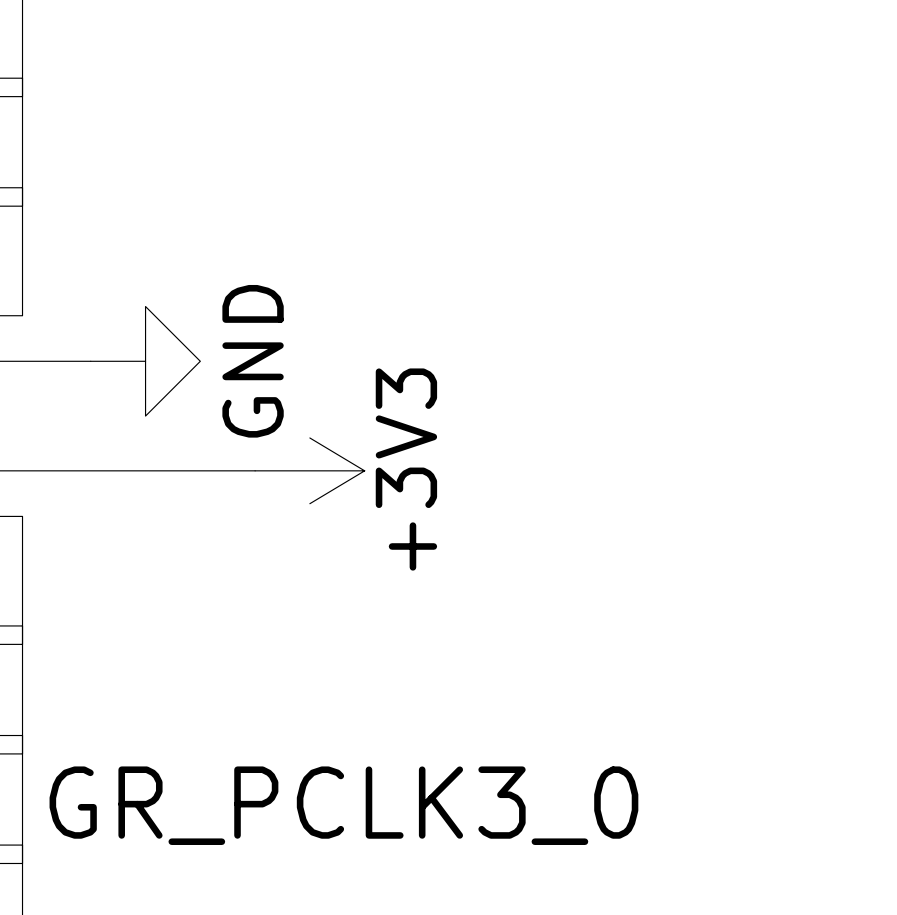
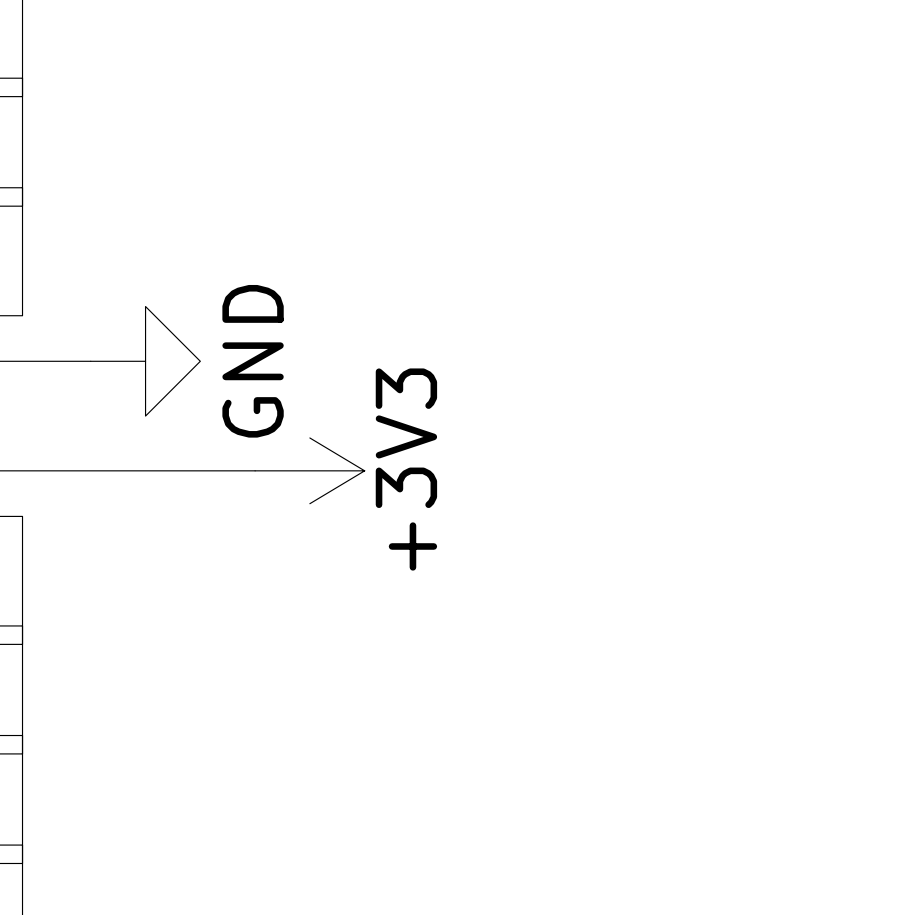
text: GR_PCLK3_0 (343, 805) -> none

